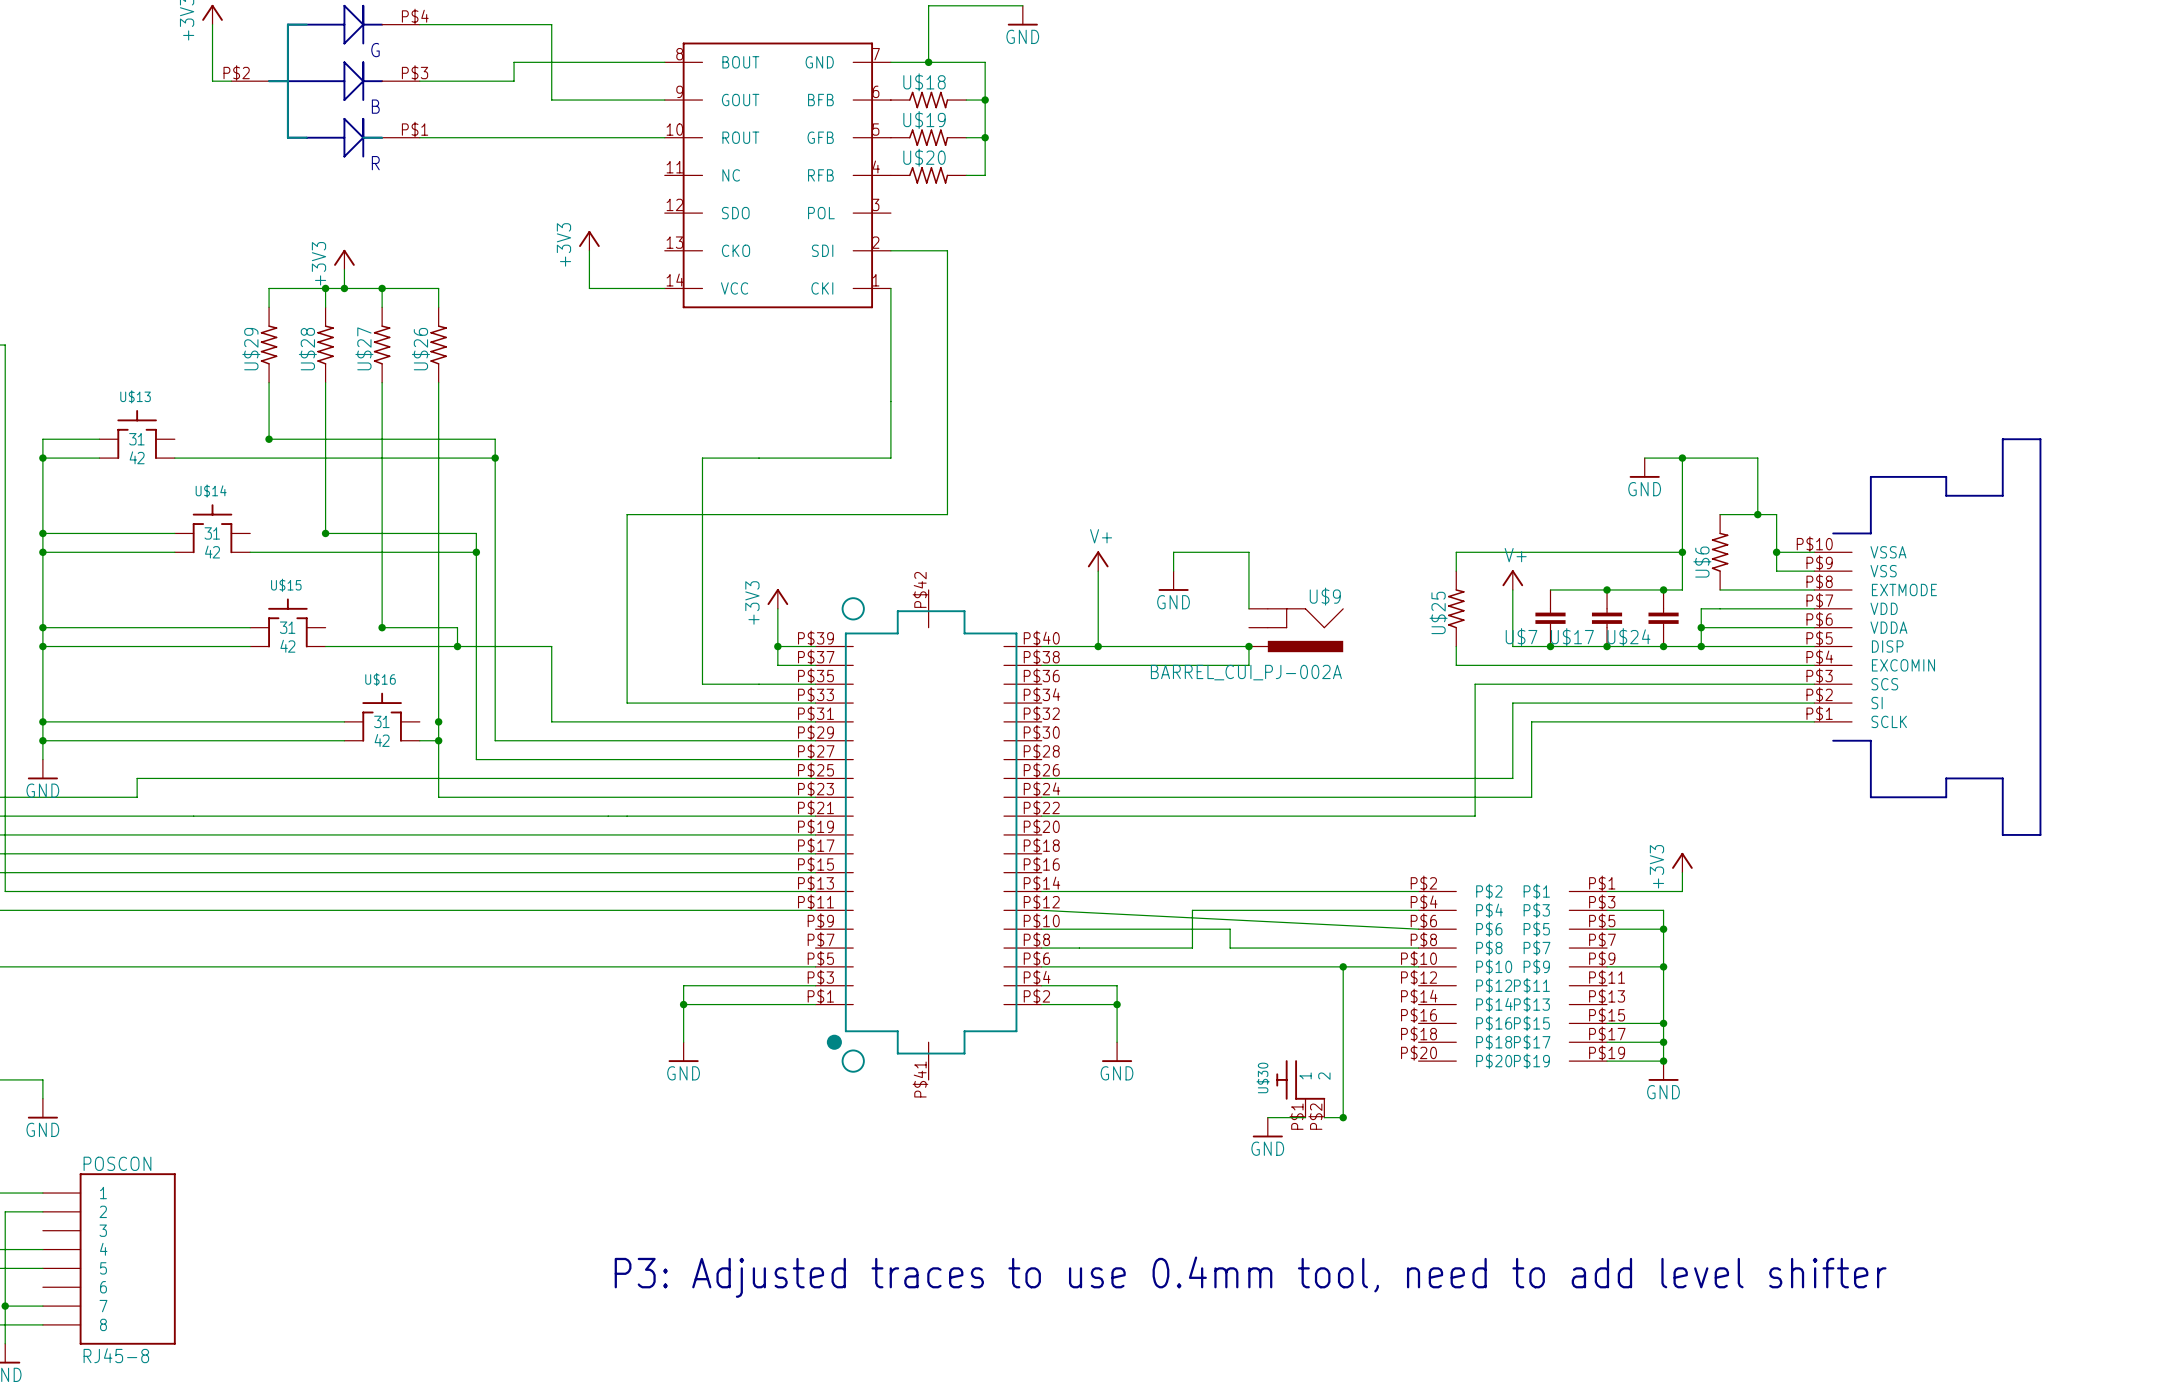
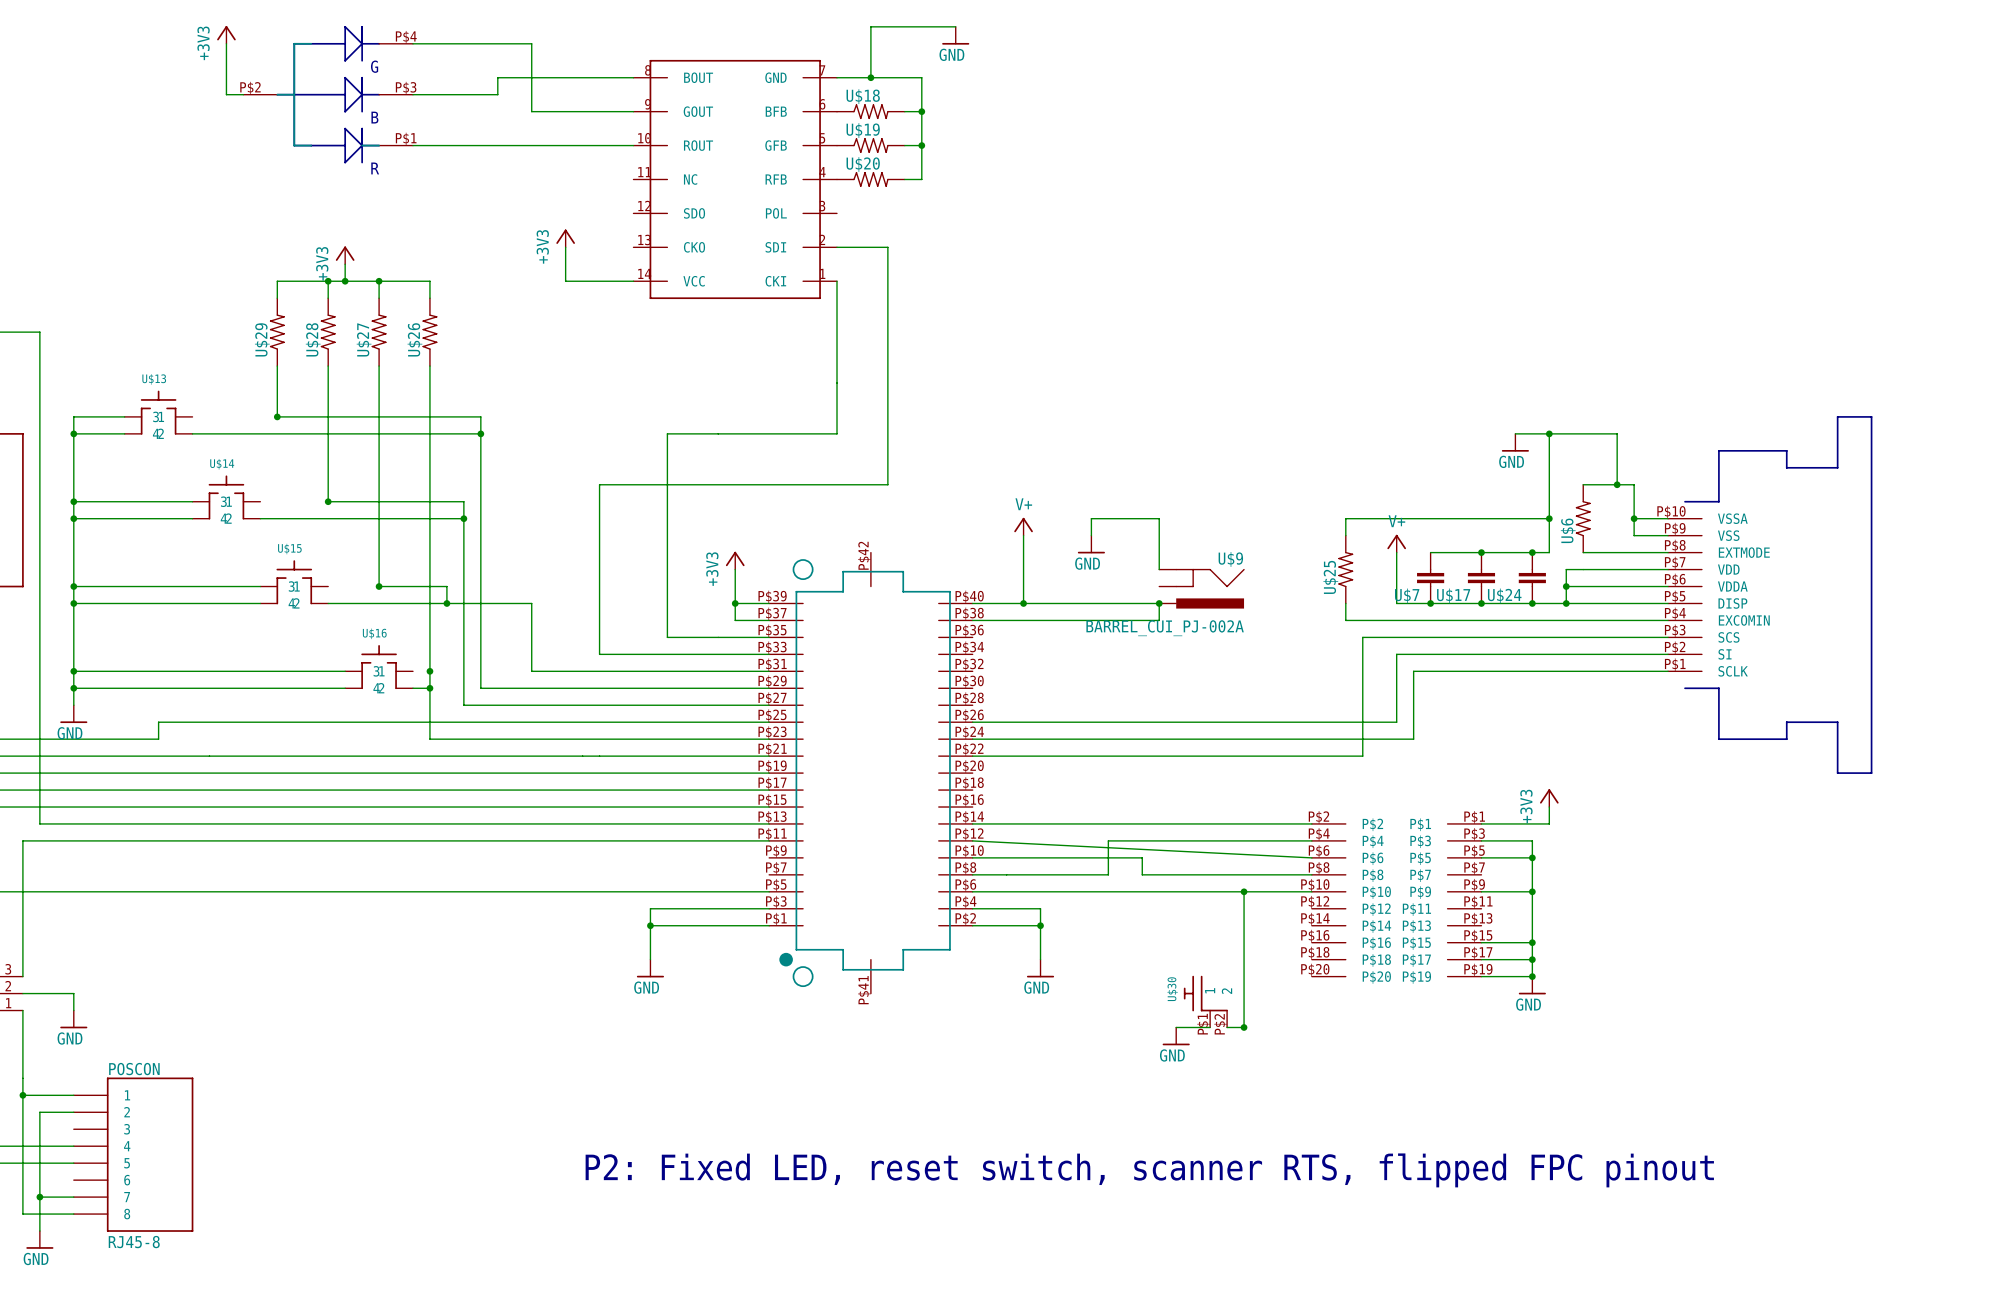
text: P3: Adjusted traces to use 0.4mm tool, need to add level shifter (1250, 1277) -> P2: Fixed LED, reset switch, scanner RTS, flipped FPC pinout (1149, 1170)

